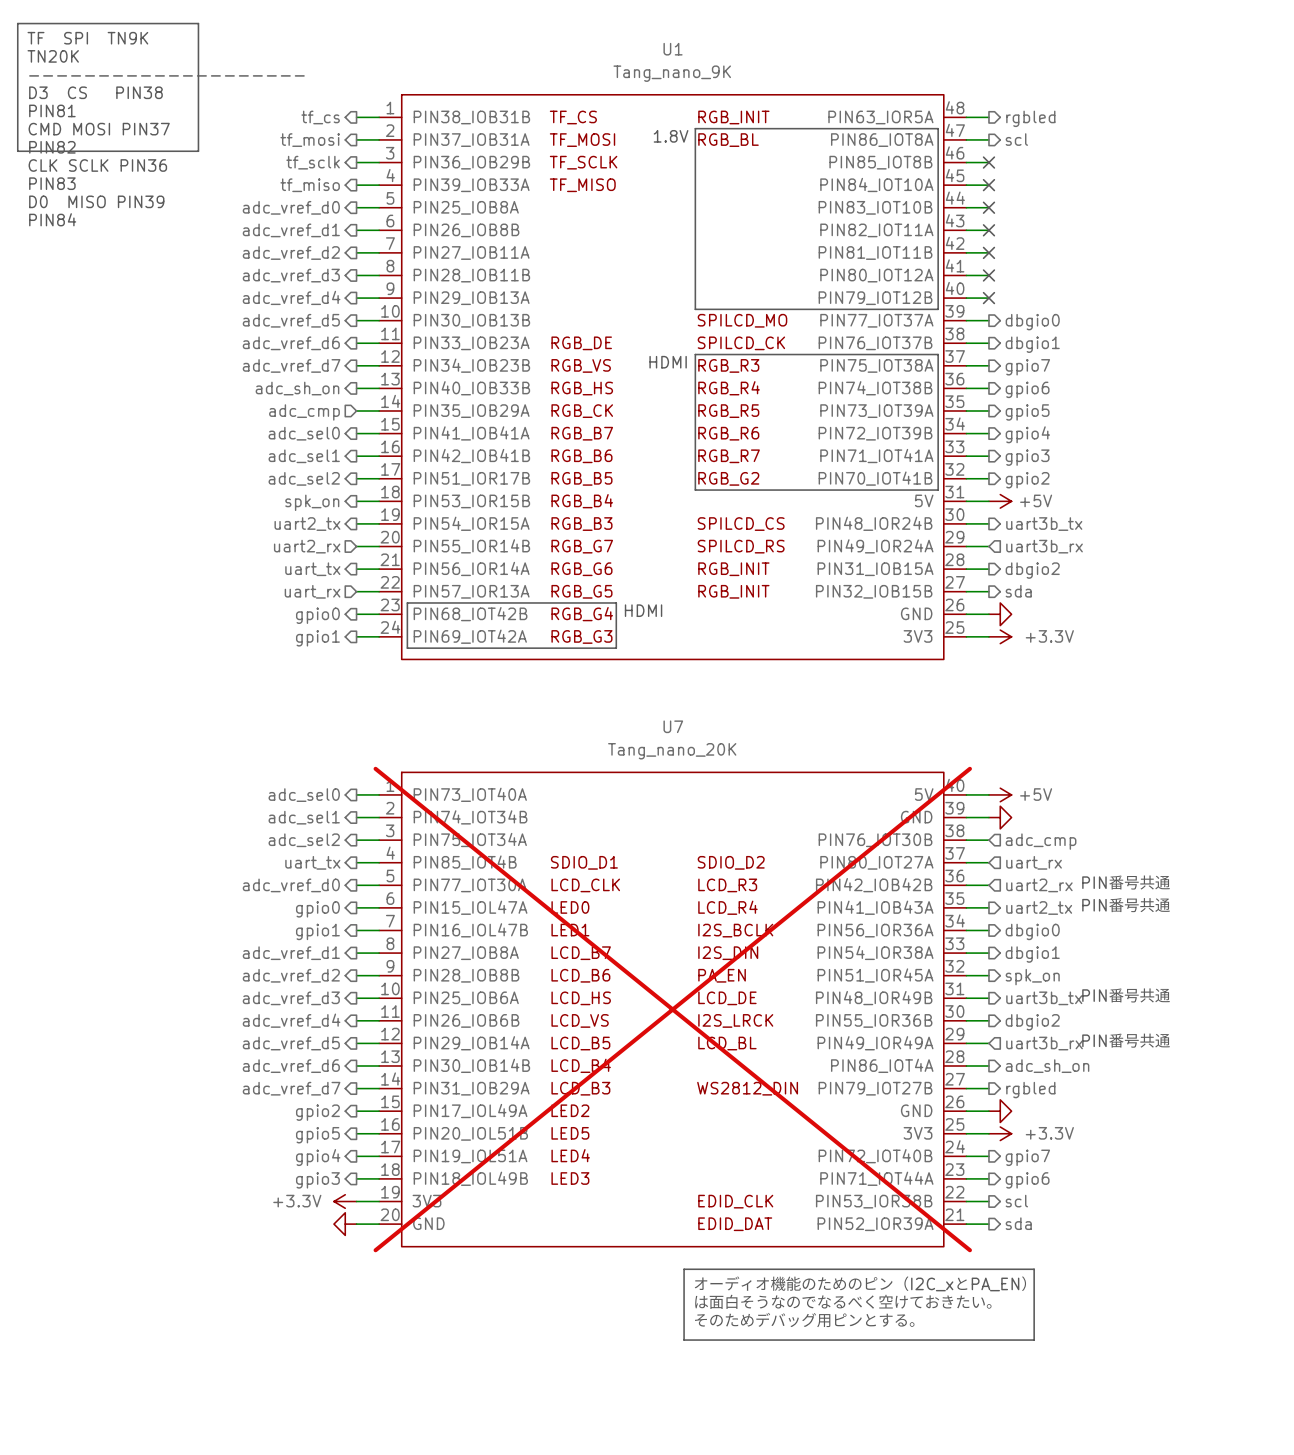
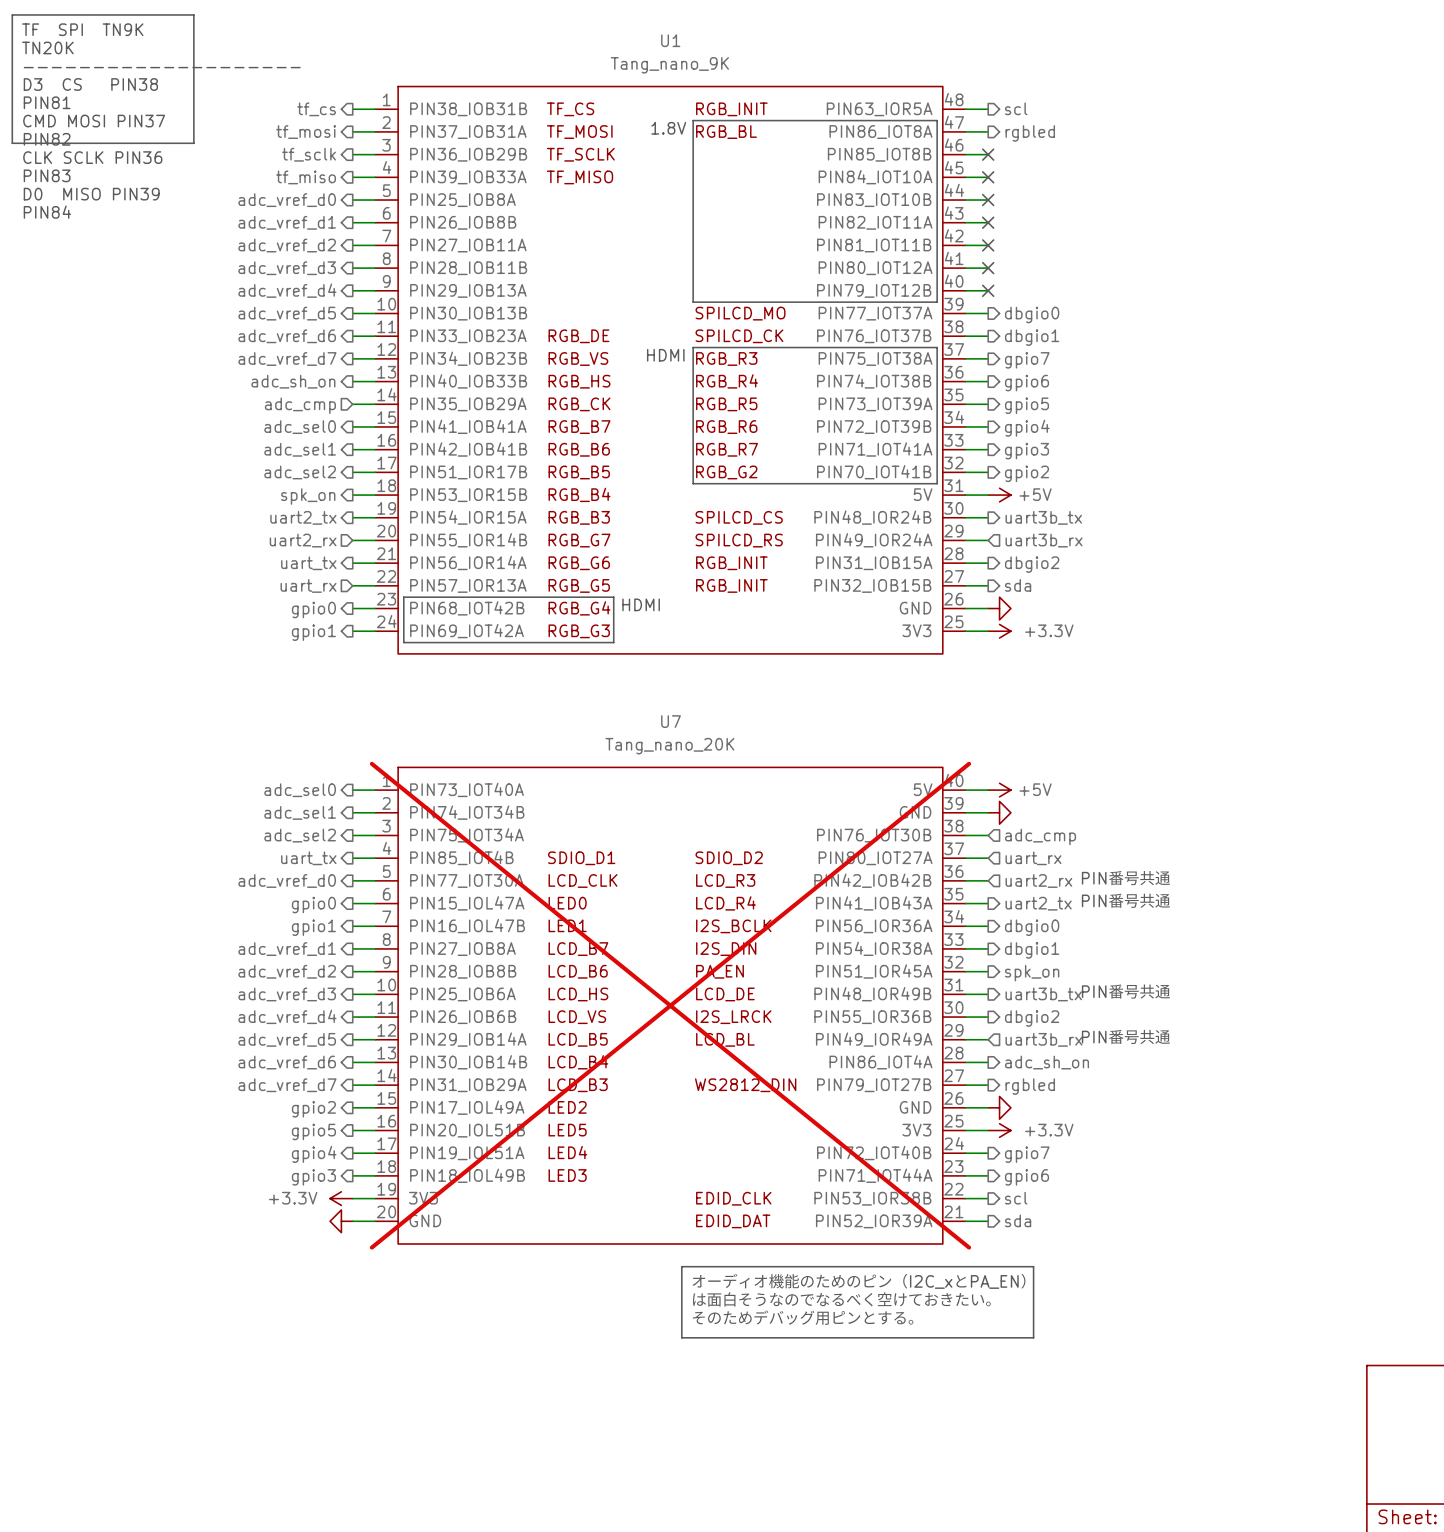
hierarchical label: rgbled (1030, 118) -> scl (1016, 108)
hierarchical label: scl (1016, 139) -> rgbled (1030, 133)

